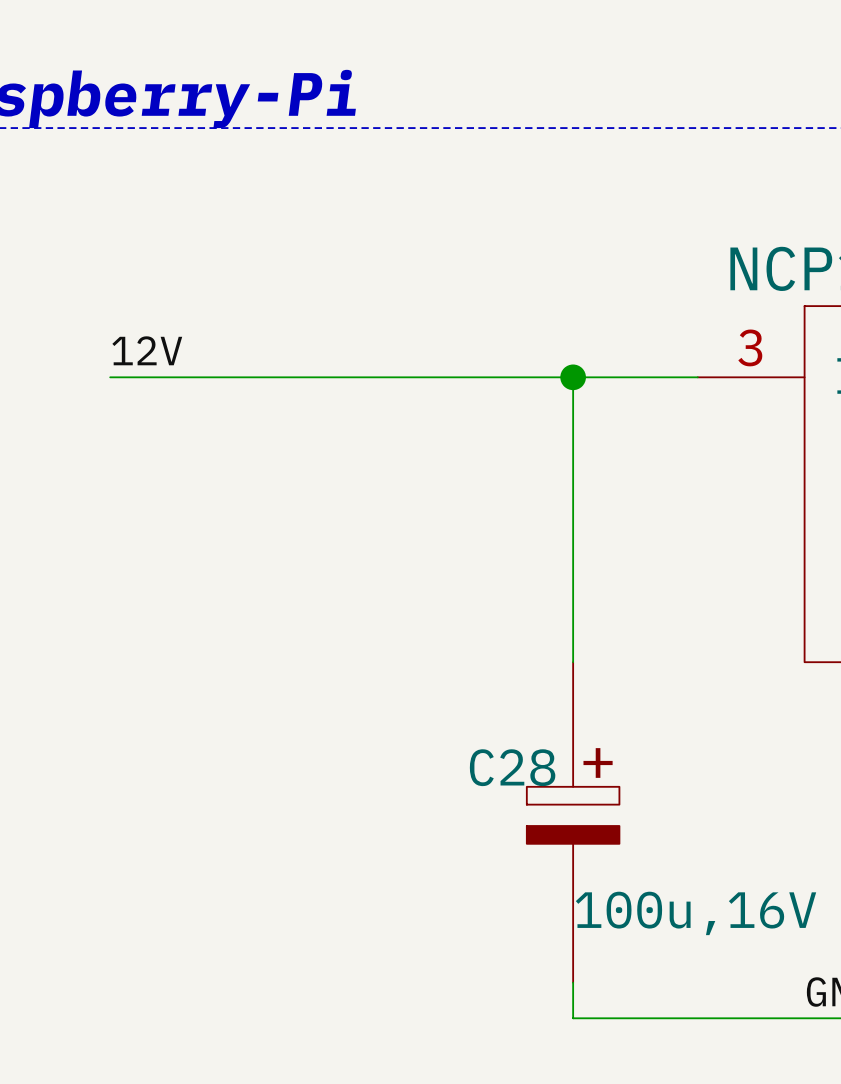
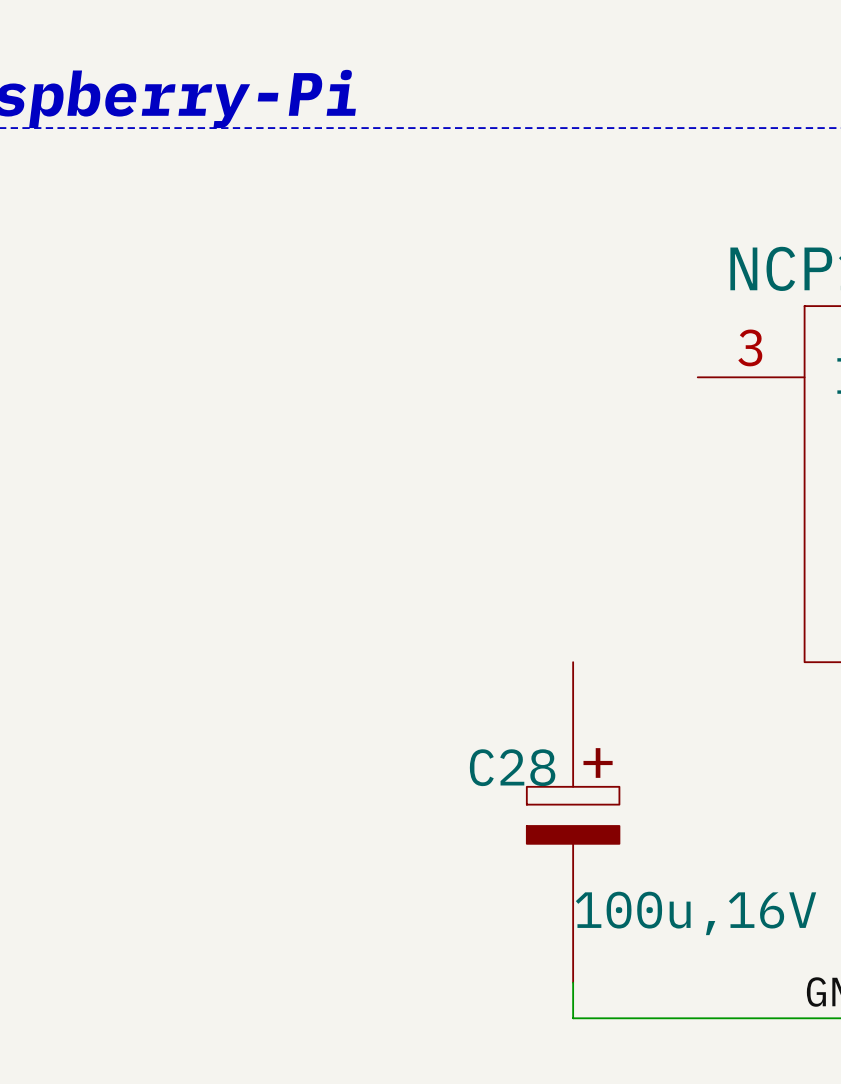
label: 12V (147, 350) -> none
wire: (110, 377) (697, 377) -> none
wire: (573, 377) (573, 662) -> none
junction: (573, 377) -> none

